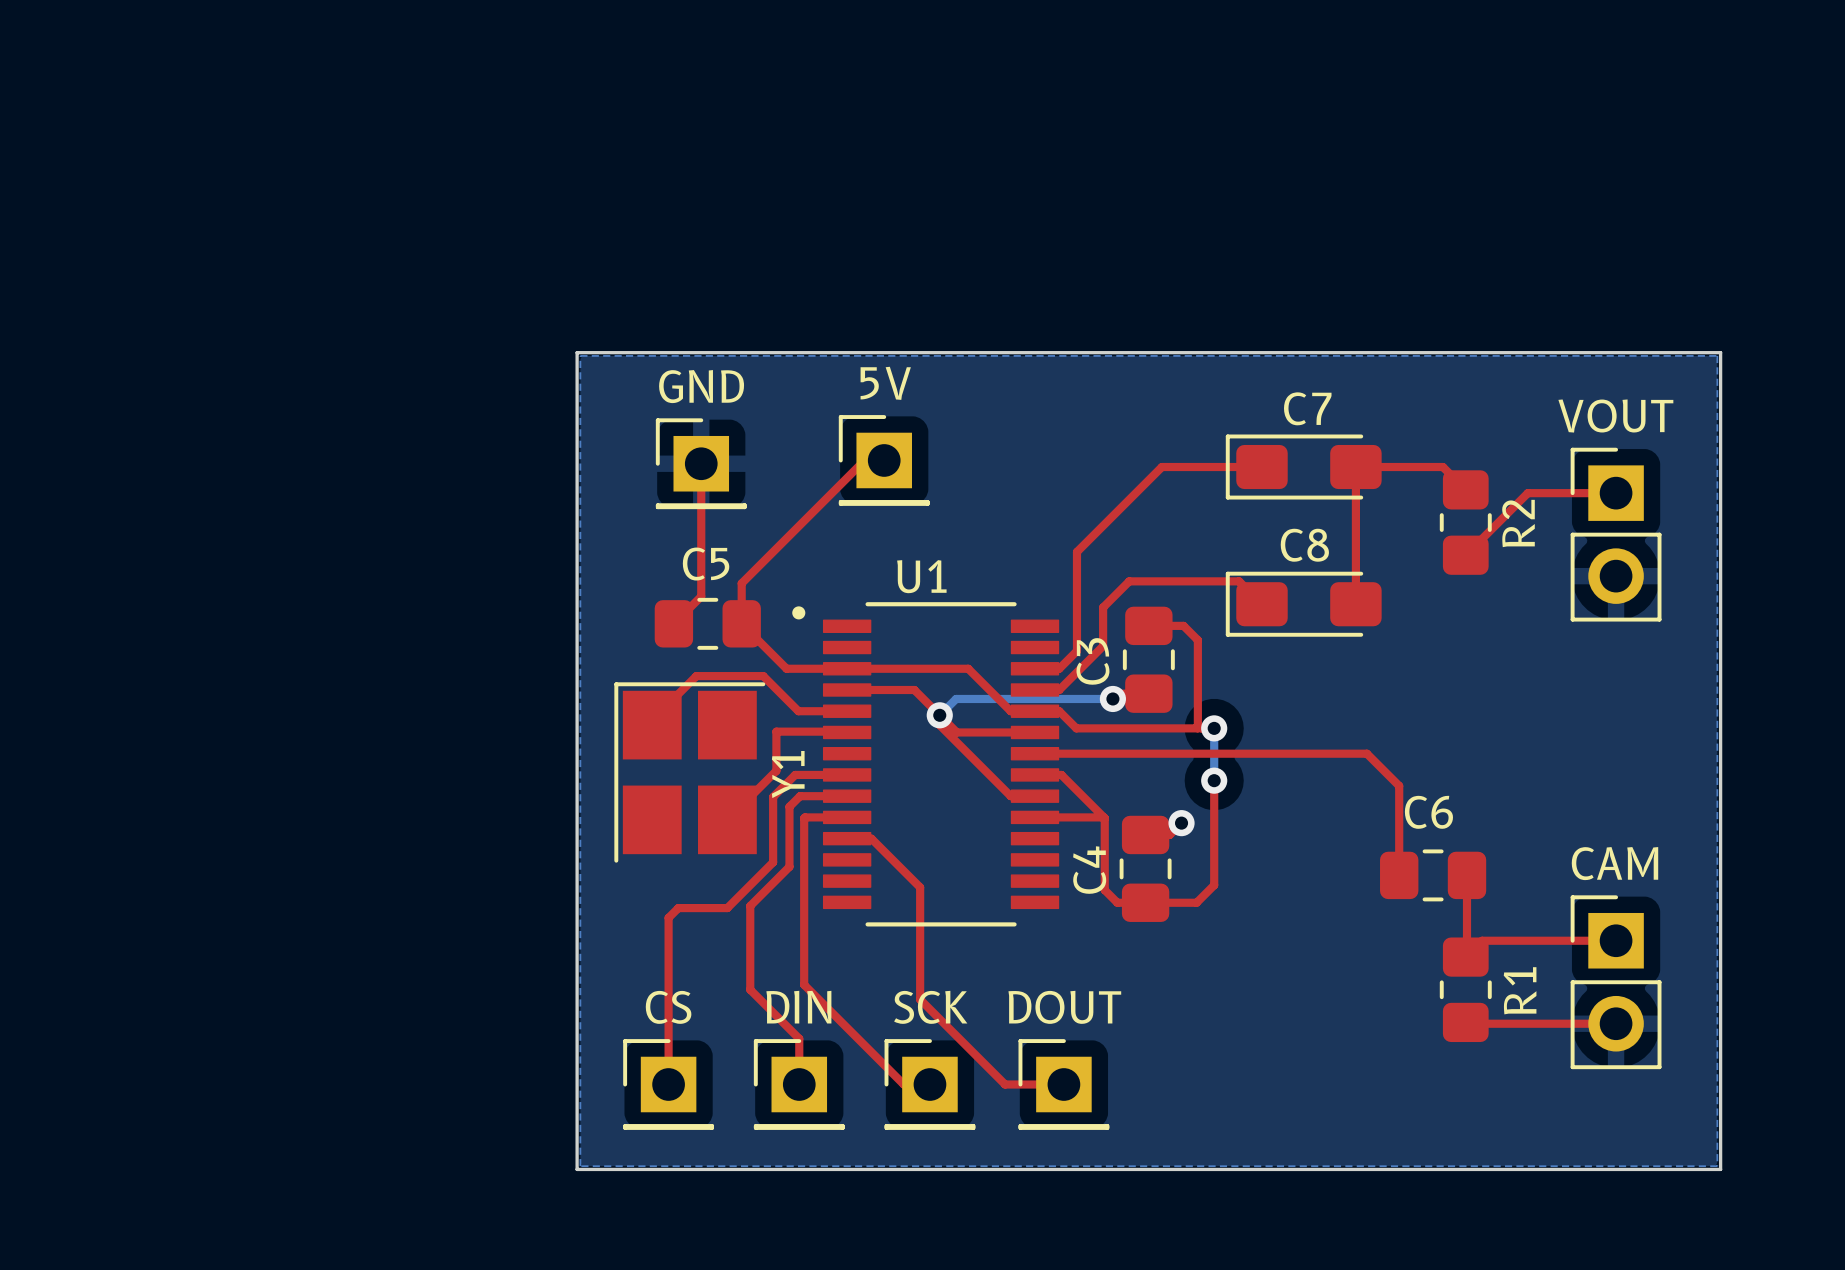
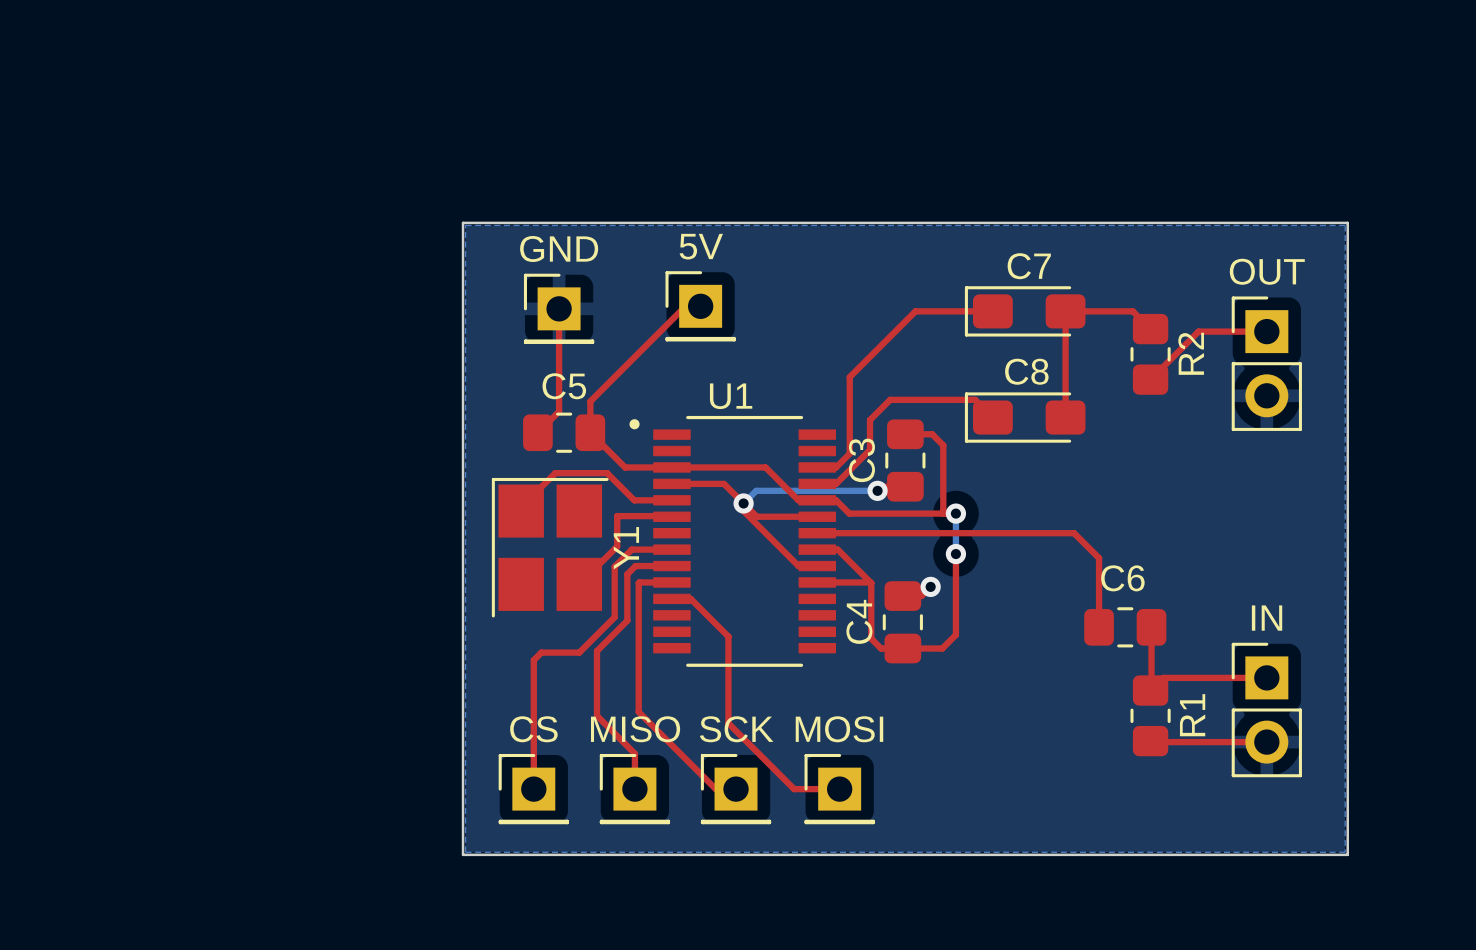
VOUT name: VOUT (1615, 416) -> OUT (1267, 271)
CAM name: CAM (1614, 863) -> IN (1267, 618)
DIN name: DIN (798, 1007) -> MISO (635, 729)
DOUT name: DOUT (1064, 1007) -> MOSI (839, 729)

